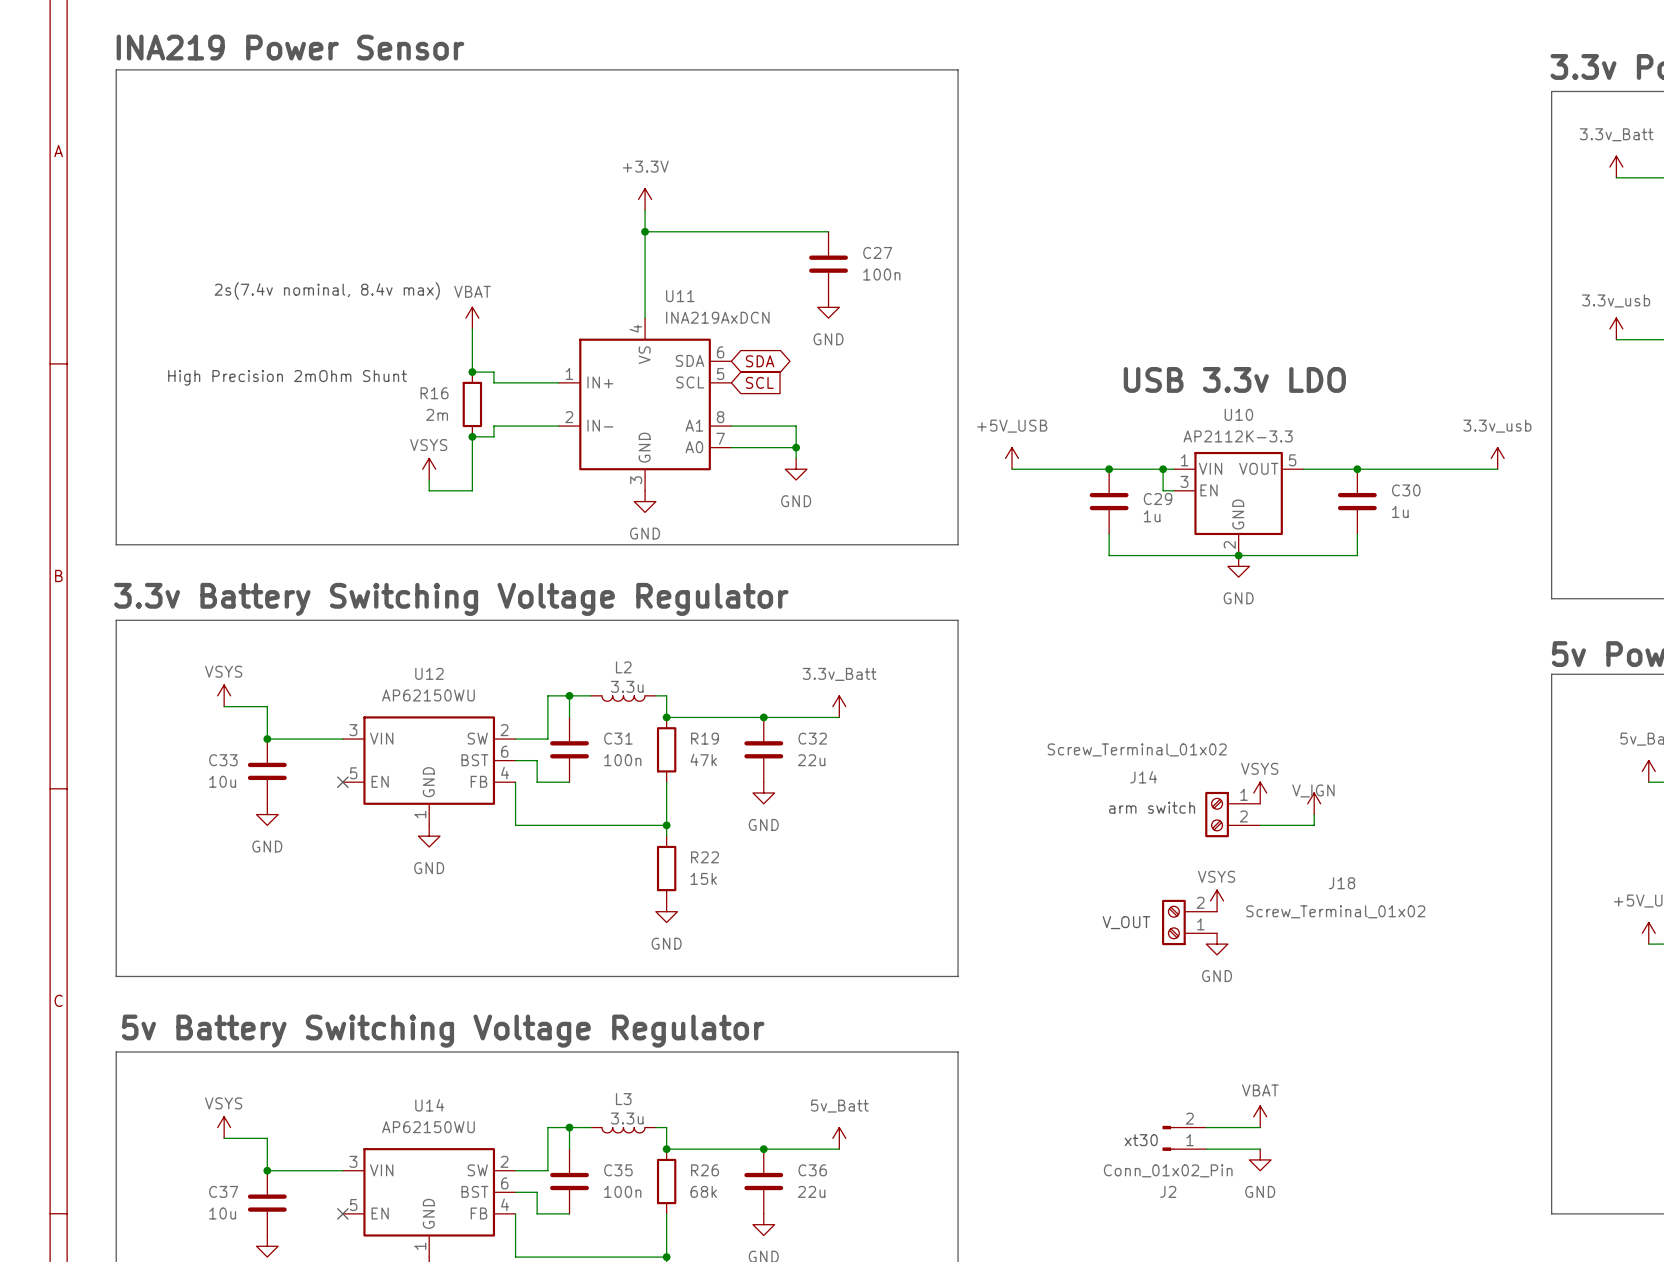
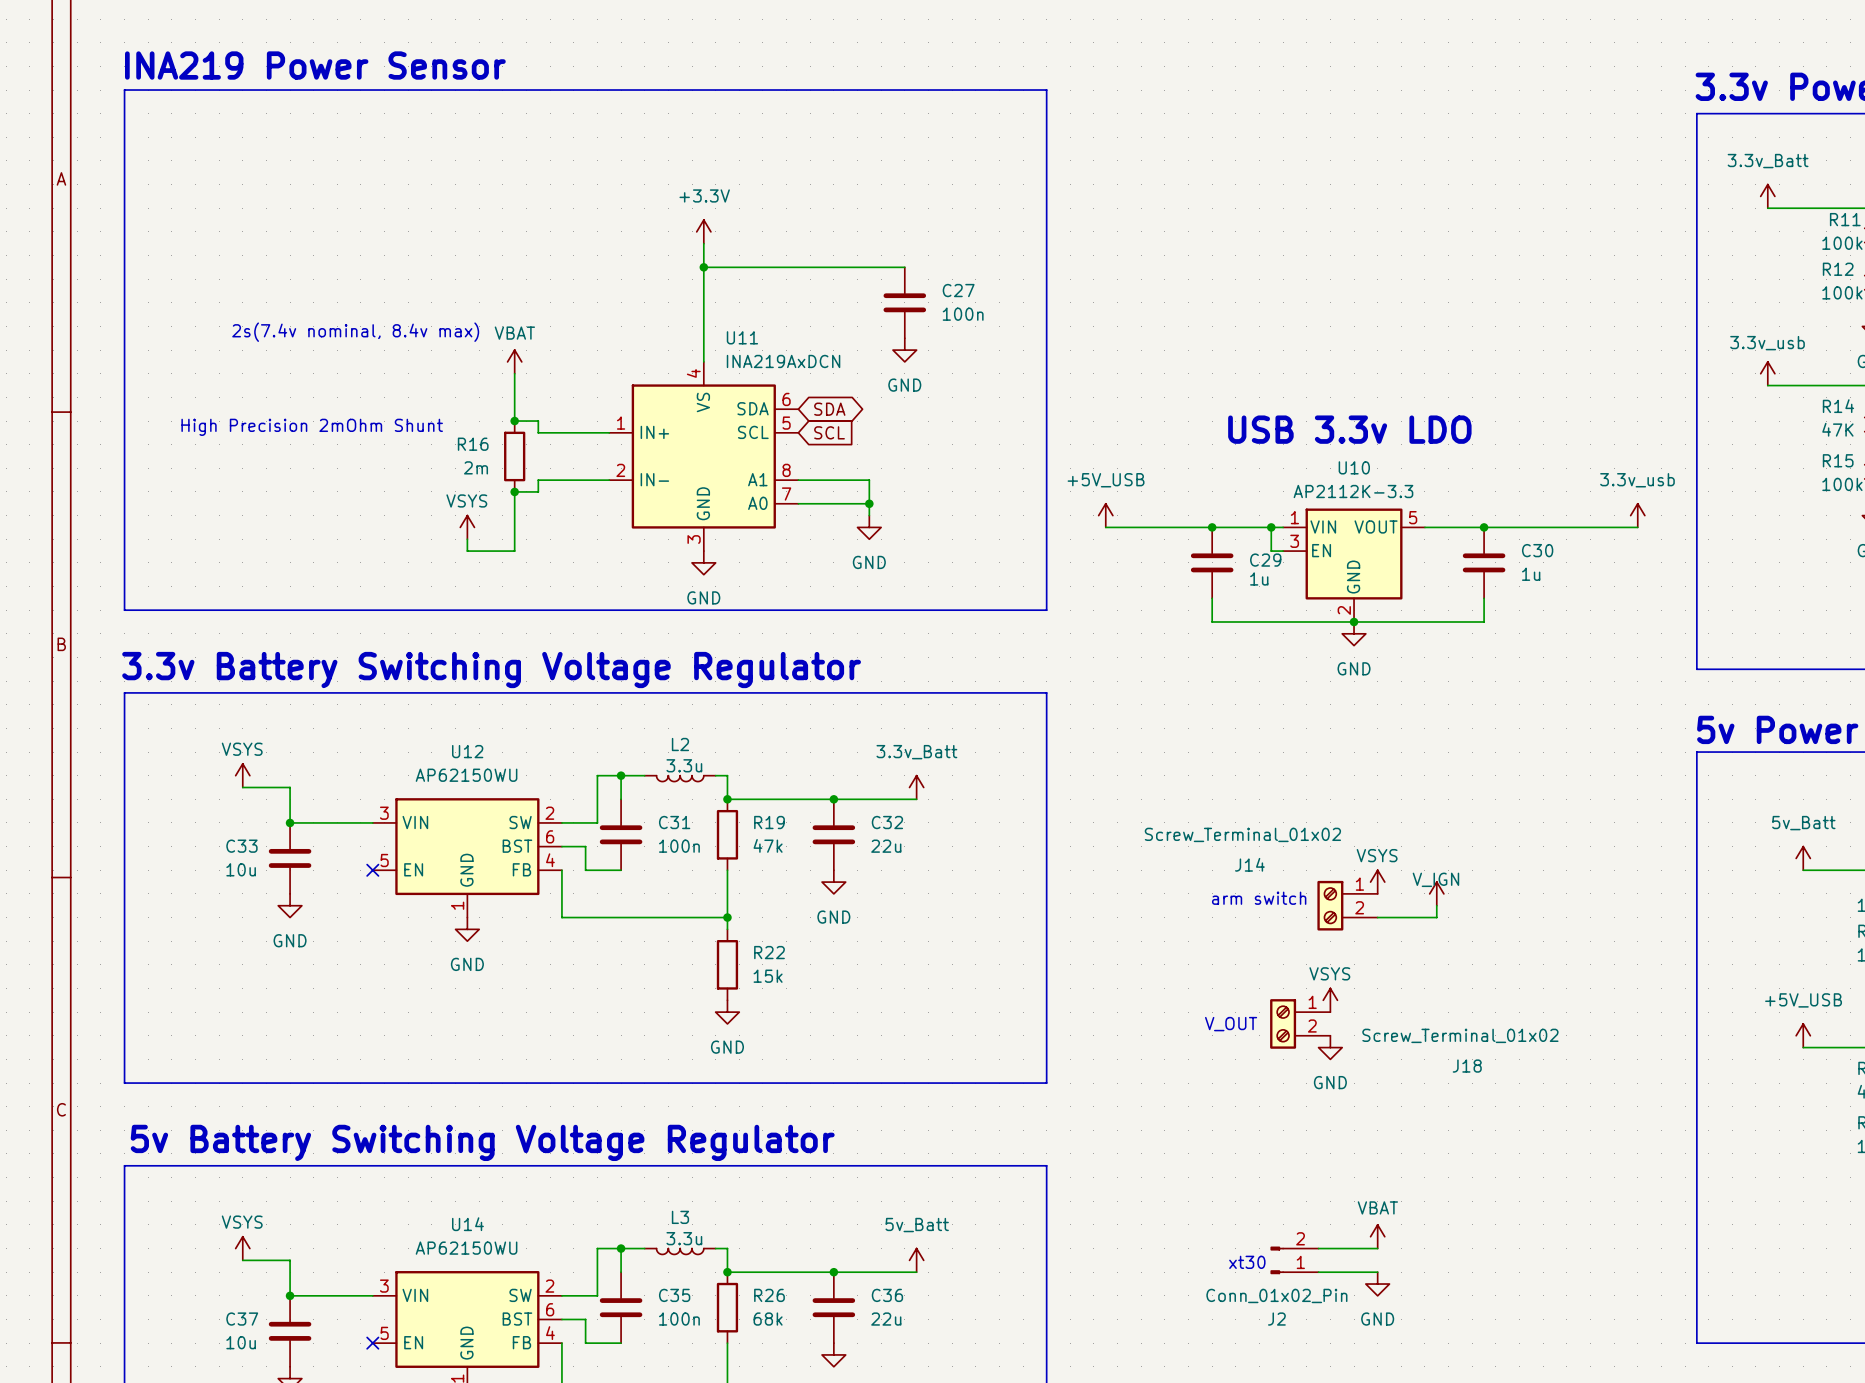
J18 flip: as is (1173, 922) -> up-down (1283, 1023)

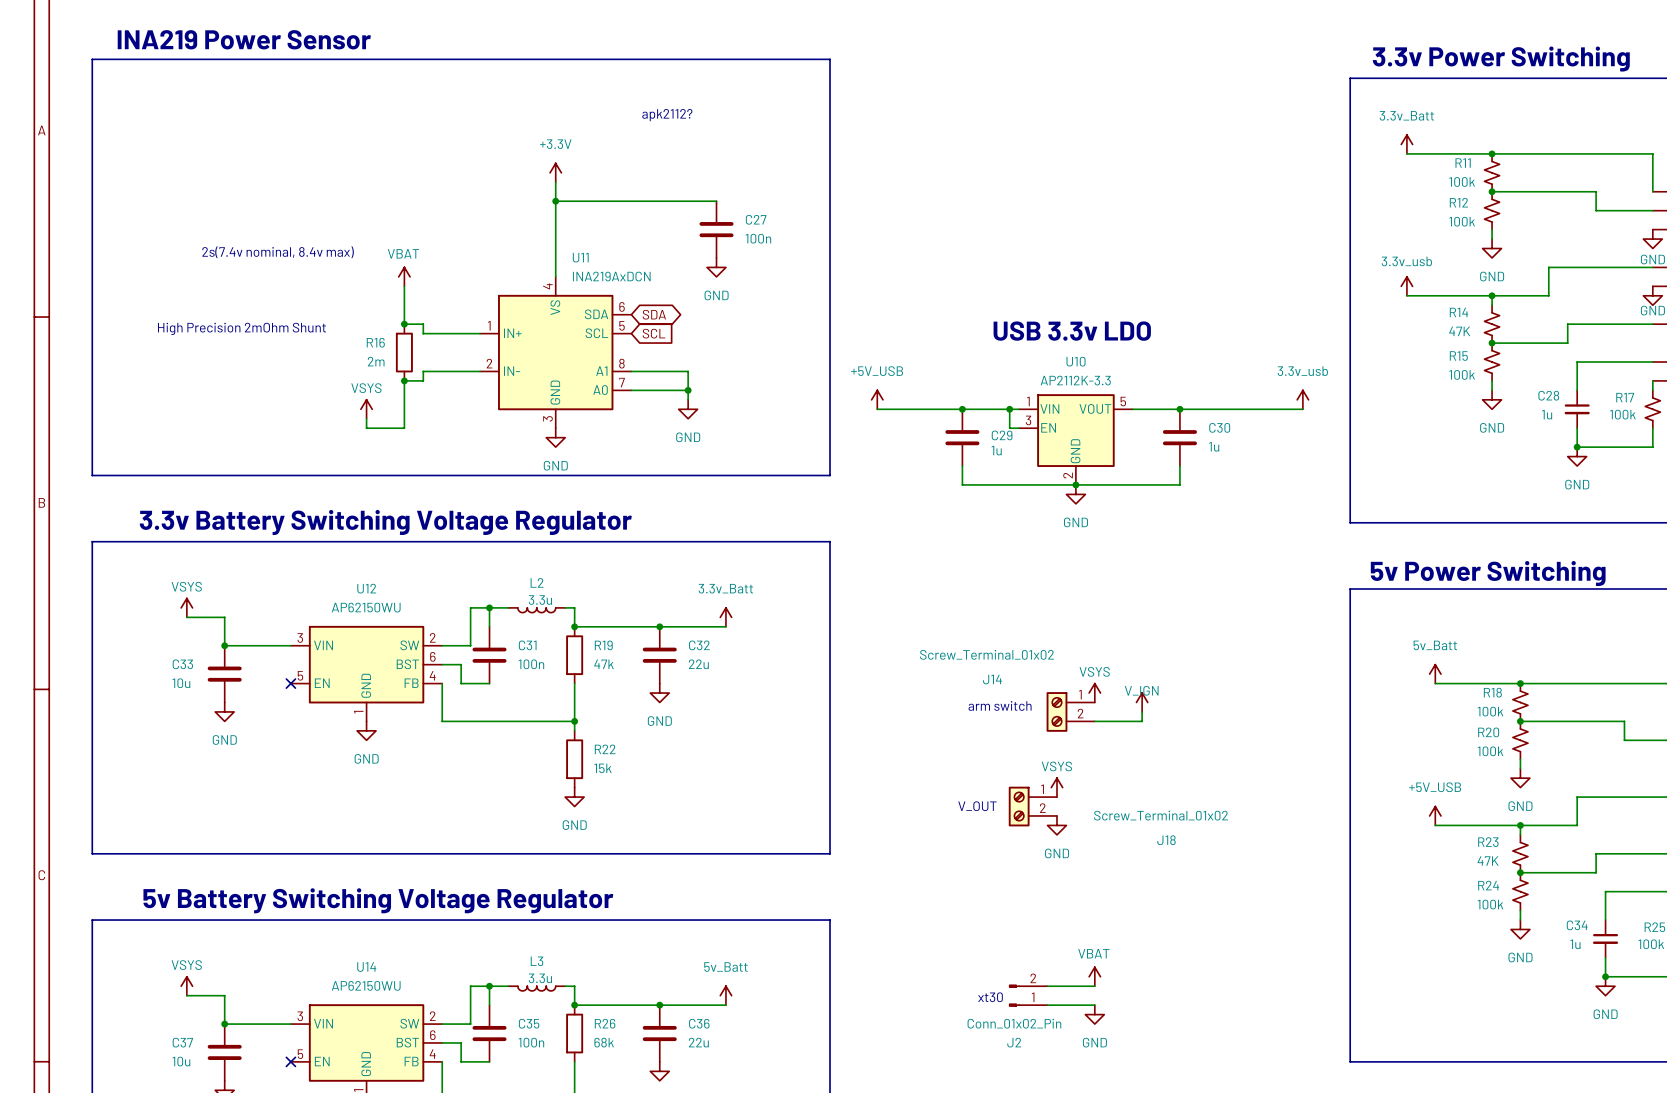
text: none -> apk2112? (667, 115)

